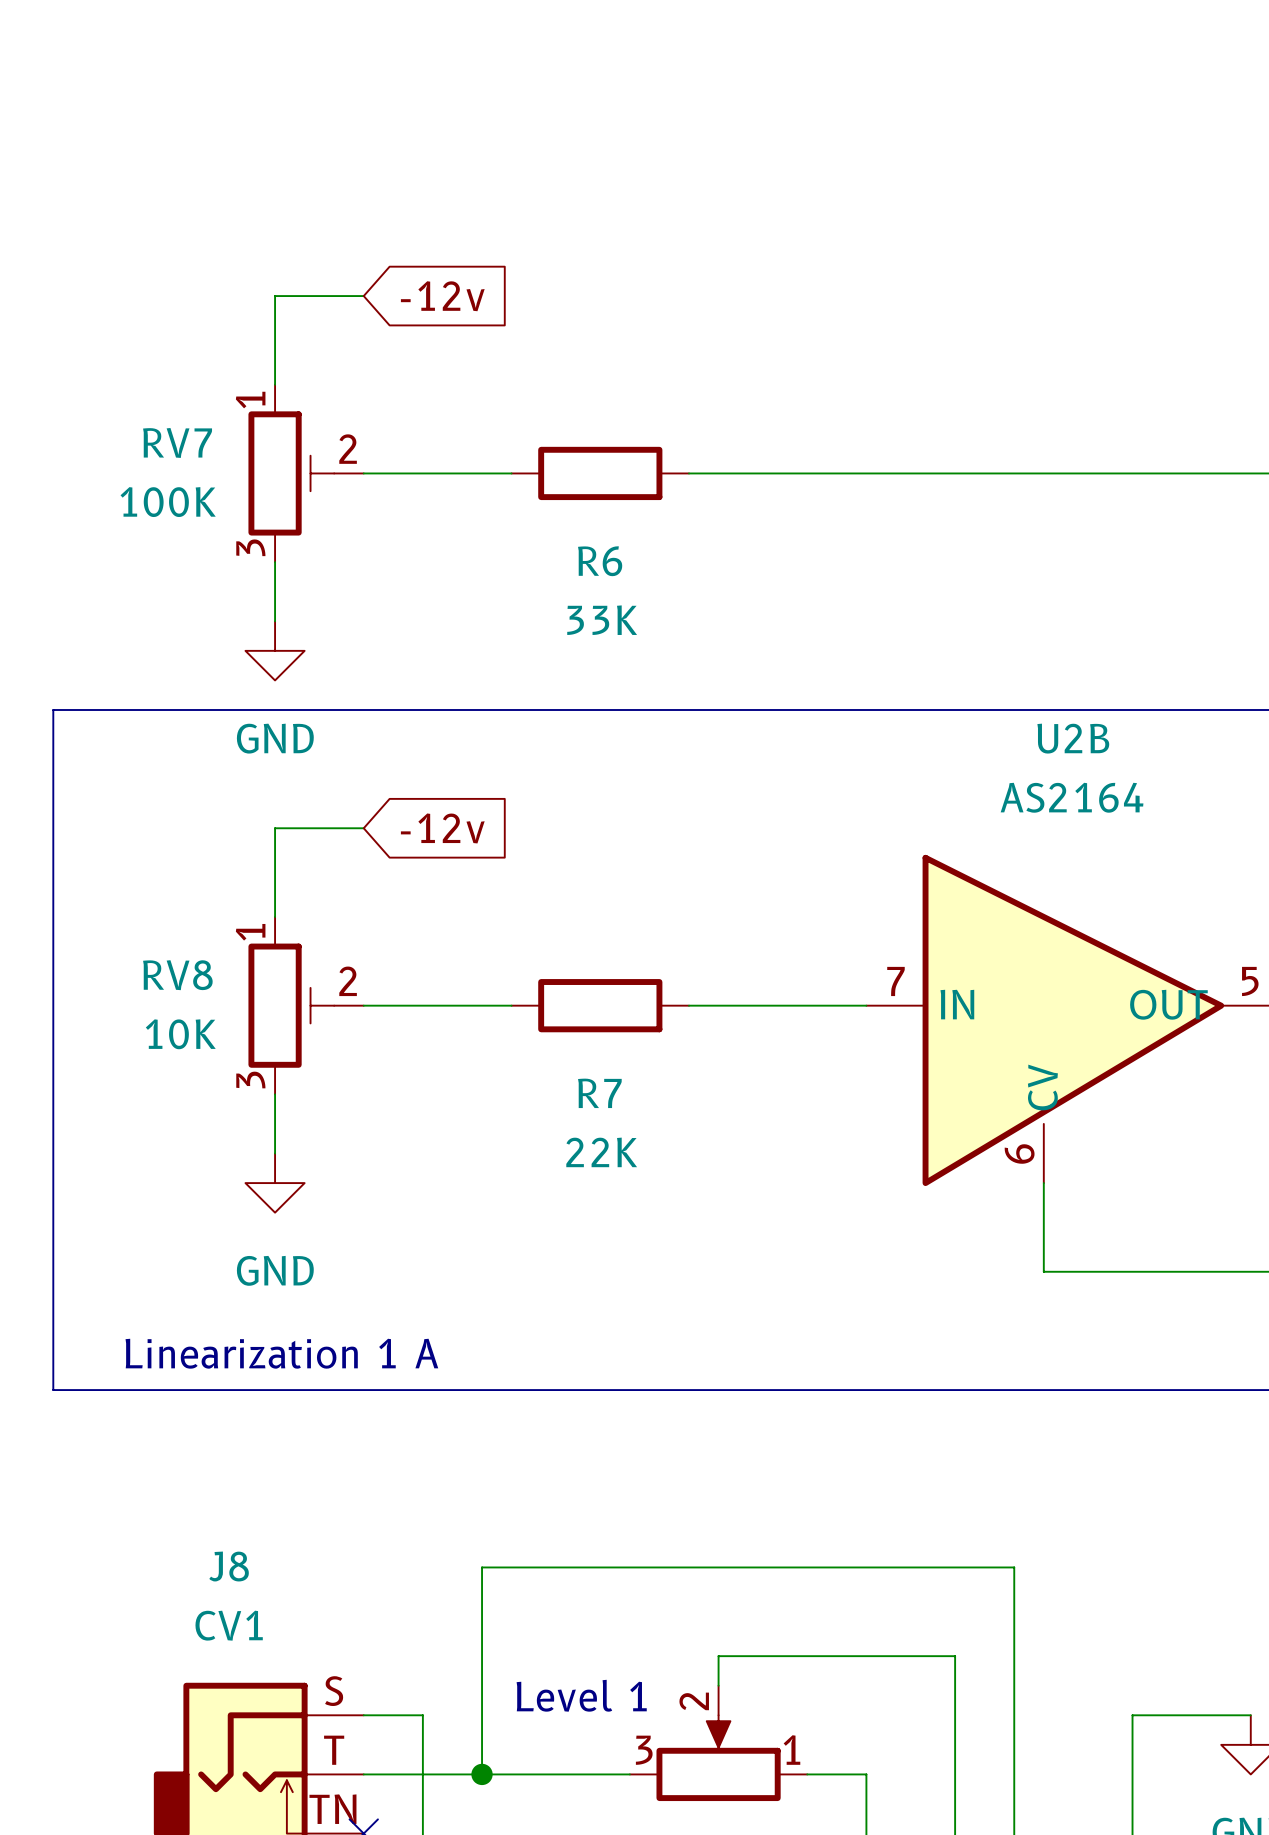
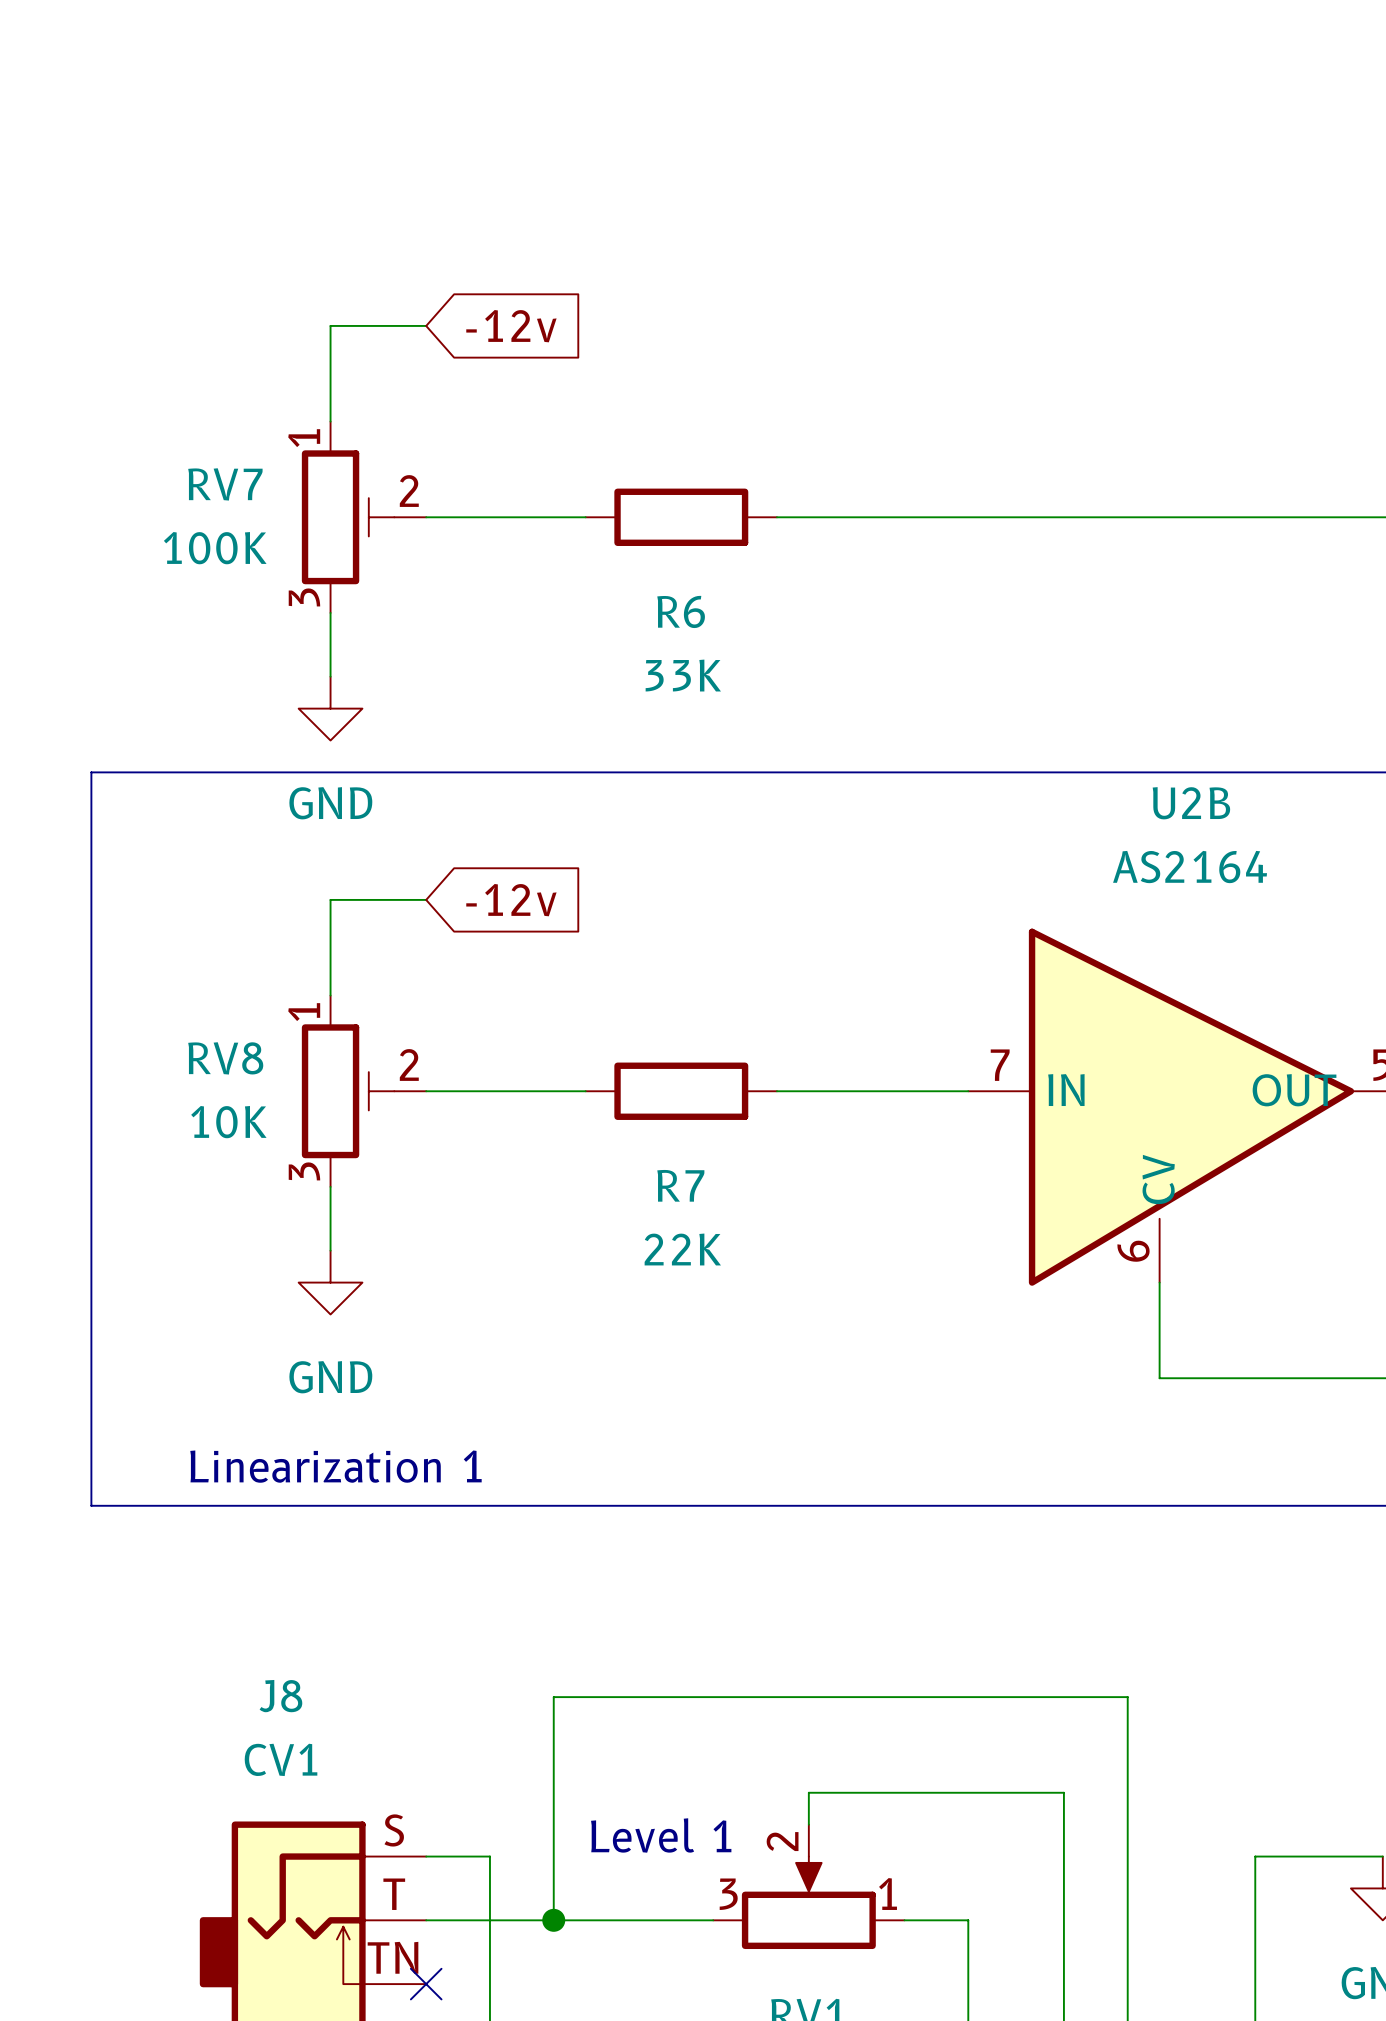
text: Linearization 1 A (281, 1353) -> Linearization 1 (335, 1466)

